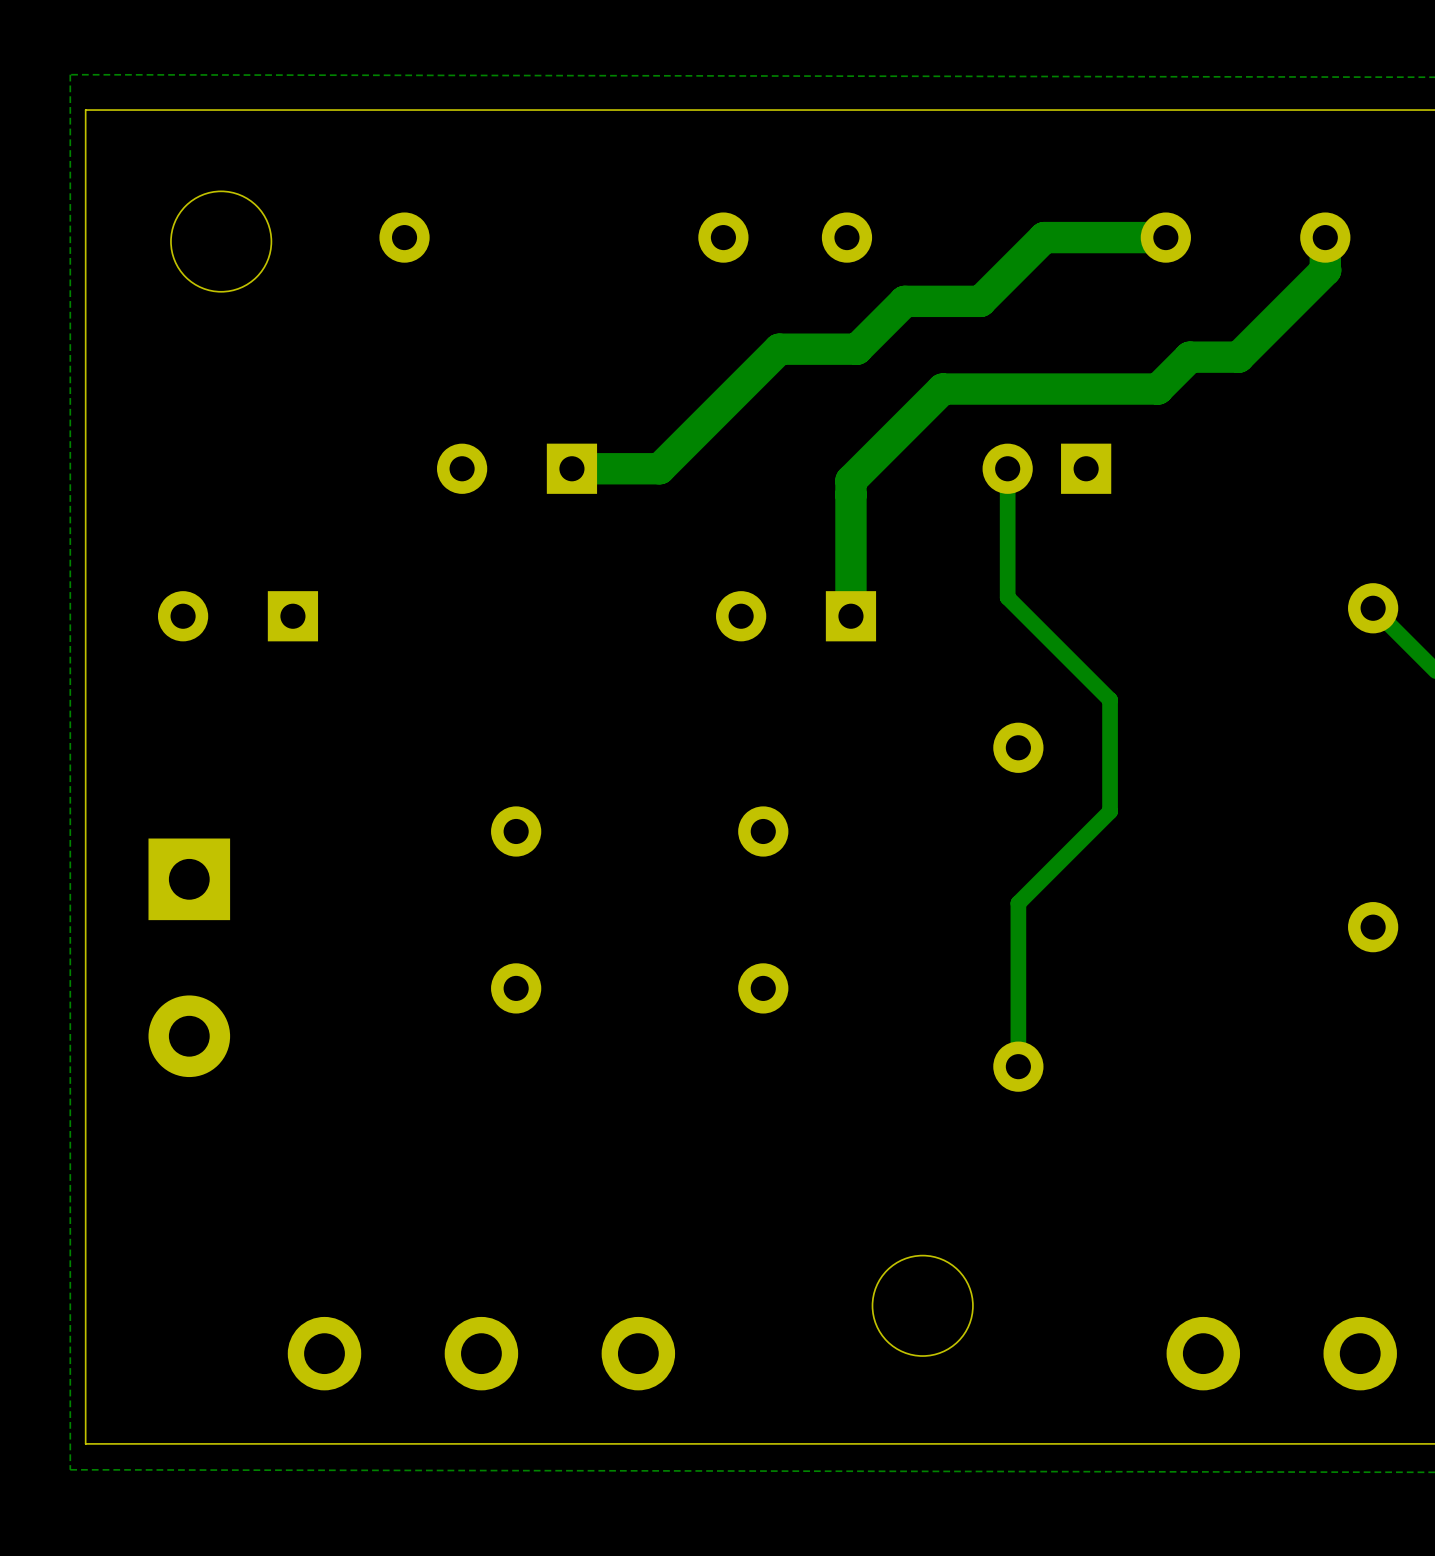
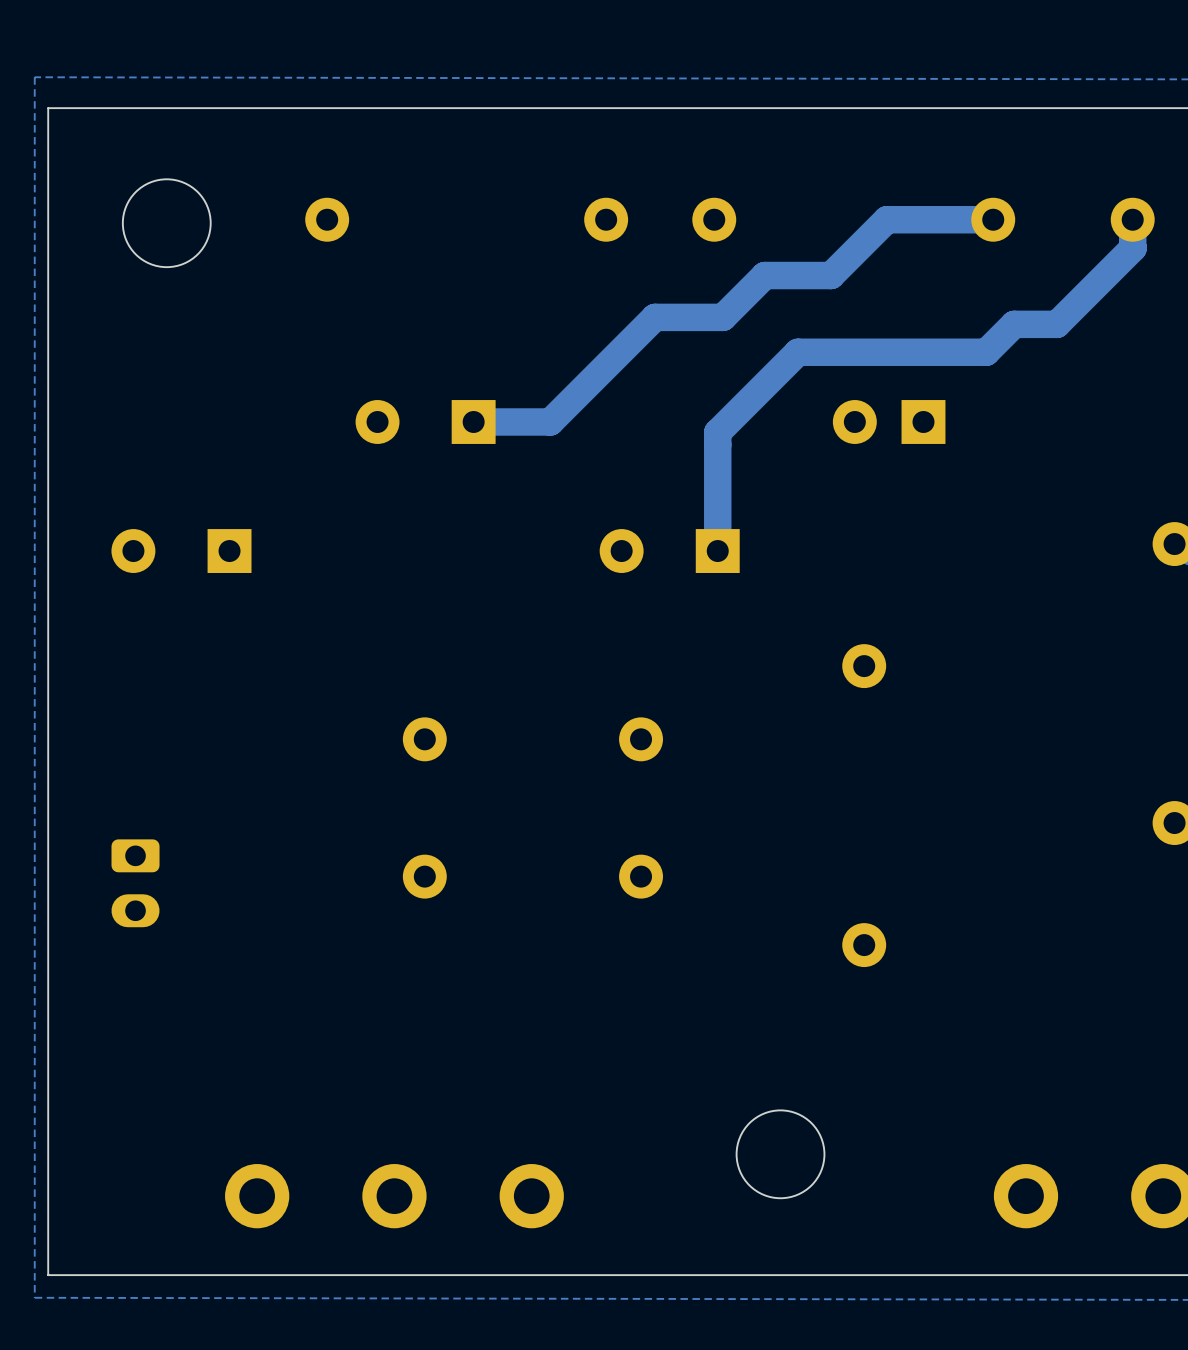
track: (1007, 468) (1007, 597) (1110, 699) (1110, 811) (1018, 903) (1018, 1066) -> none
part: (189, 957) -> none
part: none -> (135, 883)

